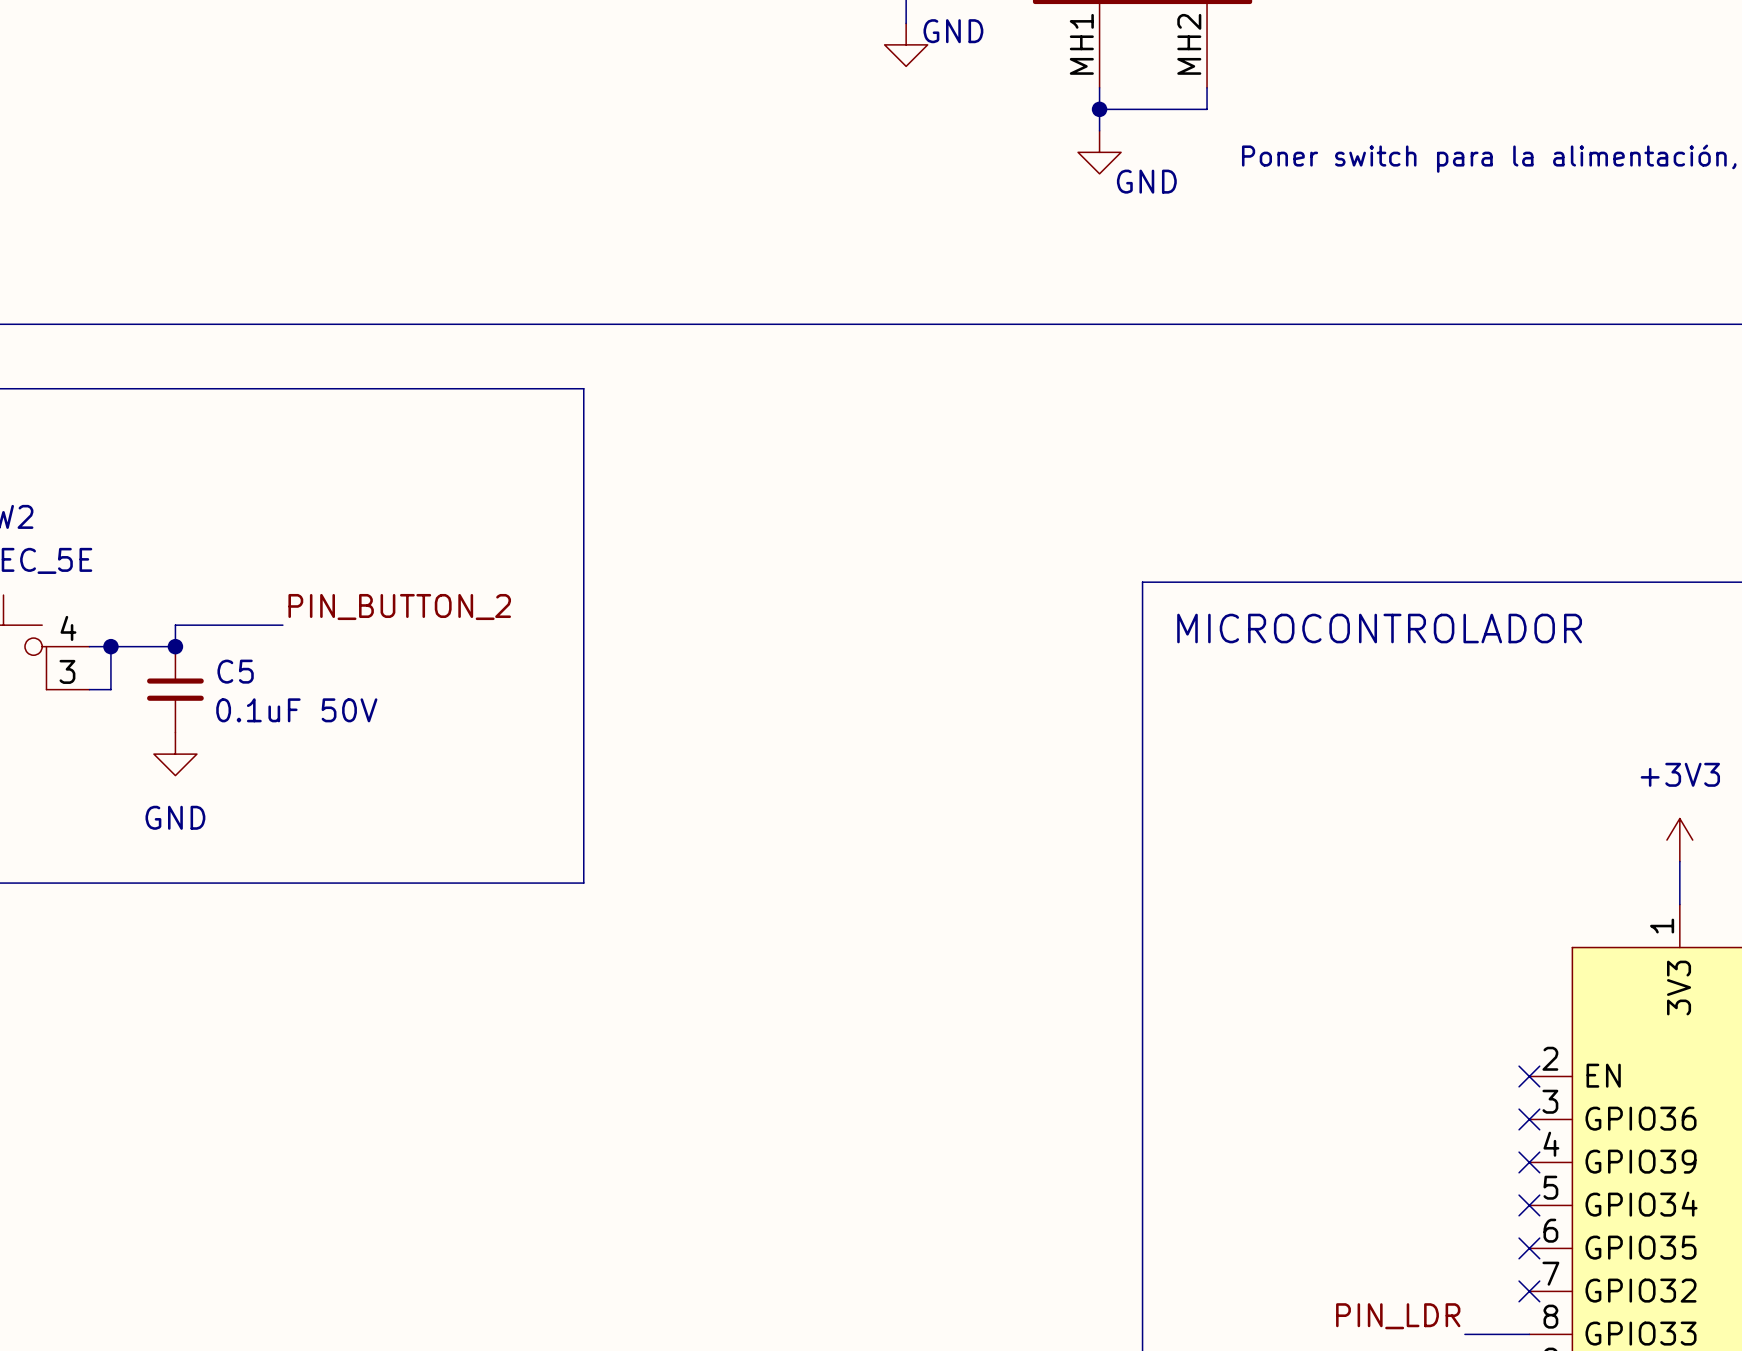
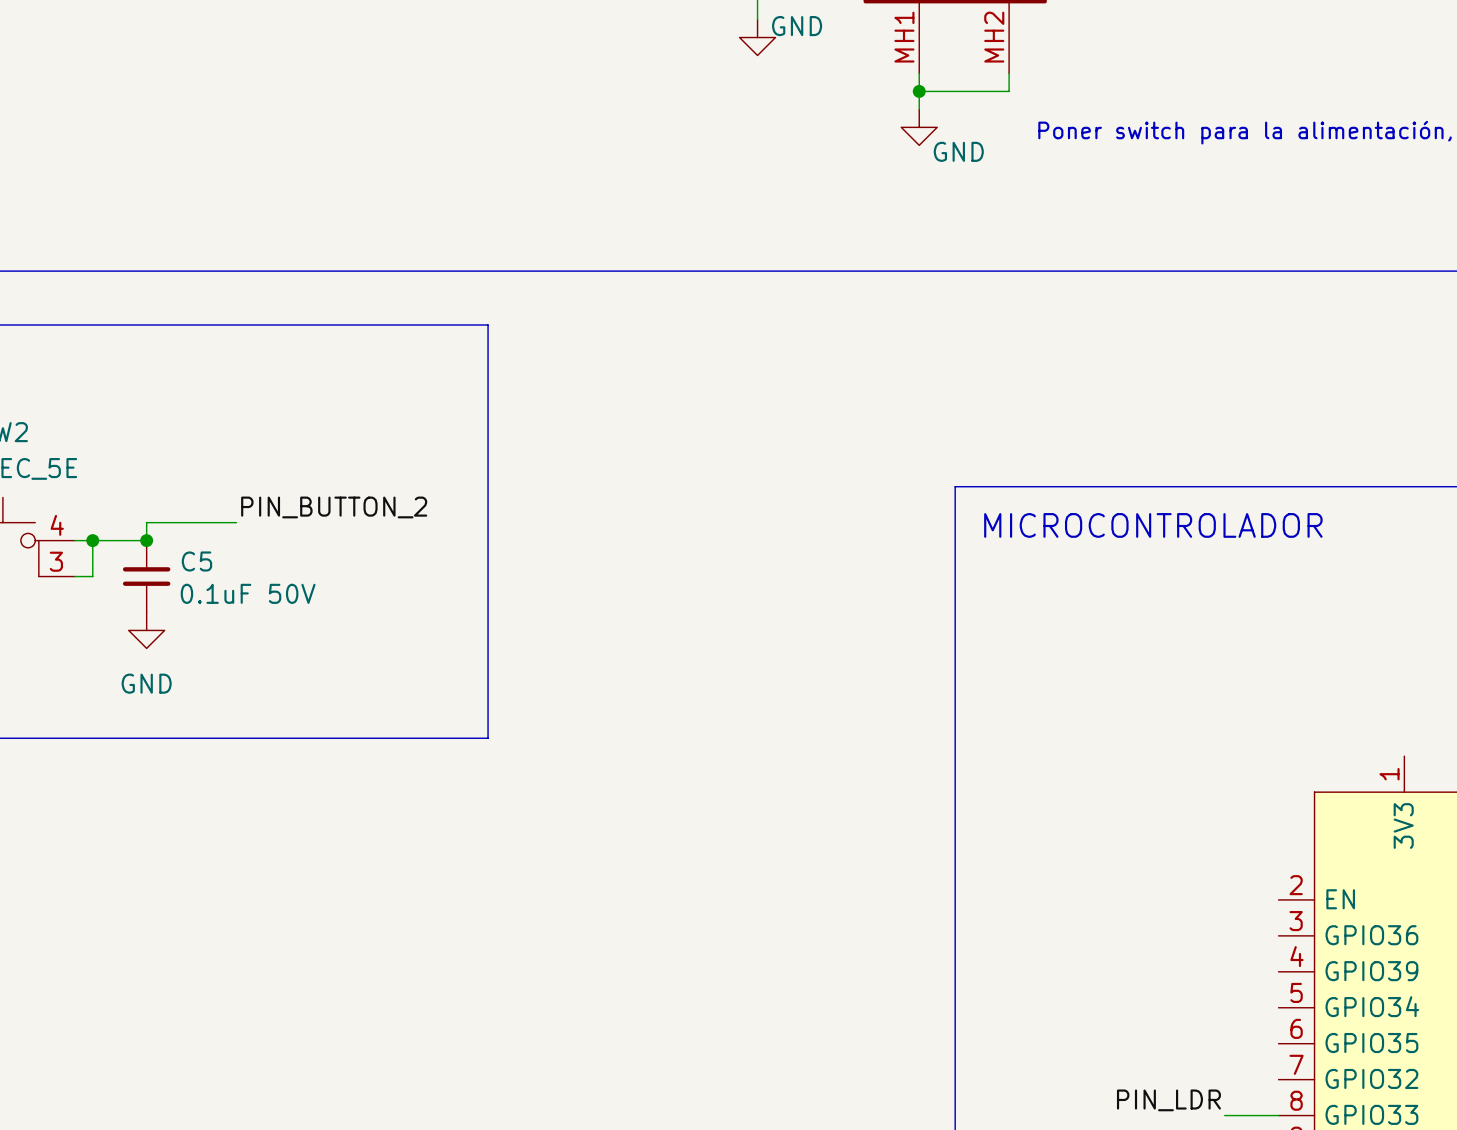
power symbol: +3V3 (1679, 840) -> none
wire: (1679, 861) (1679, 904) -> none
no-connect mark: (1529, 1076) -> none
no-connect mark: (1529, 1119) -> none
no-connect mark: (1529, 1162) -> none
no-connect mark: (1529, 1205) -> none
no-connect mark: (1529, 1248) -> none
no-connect mark: (1529, 1291) -> none

